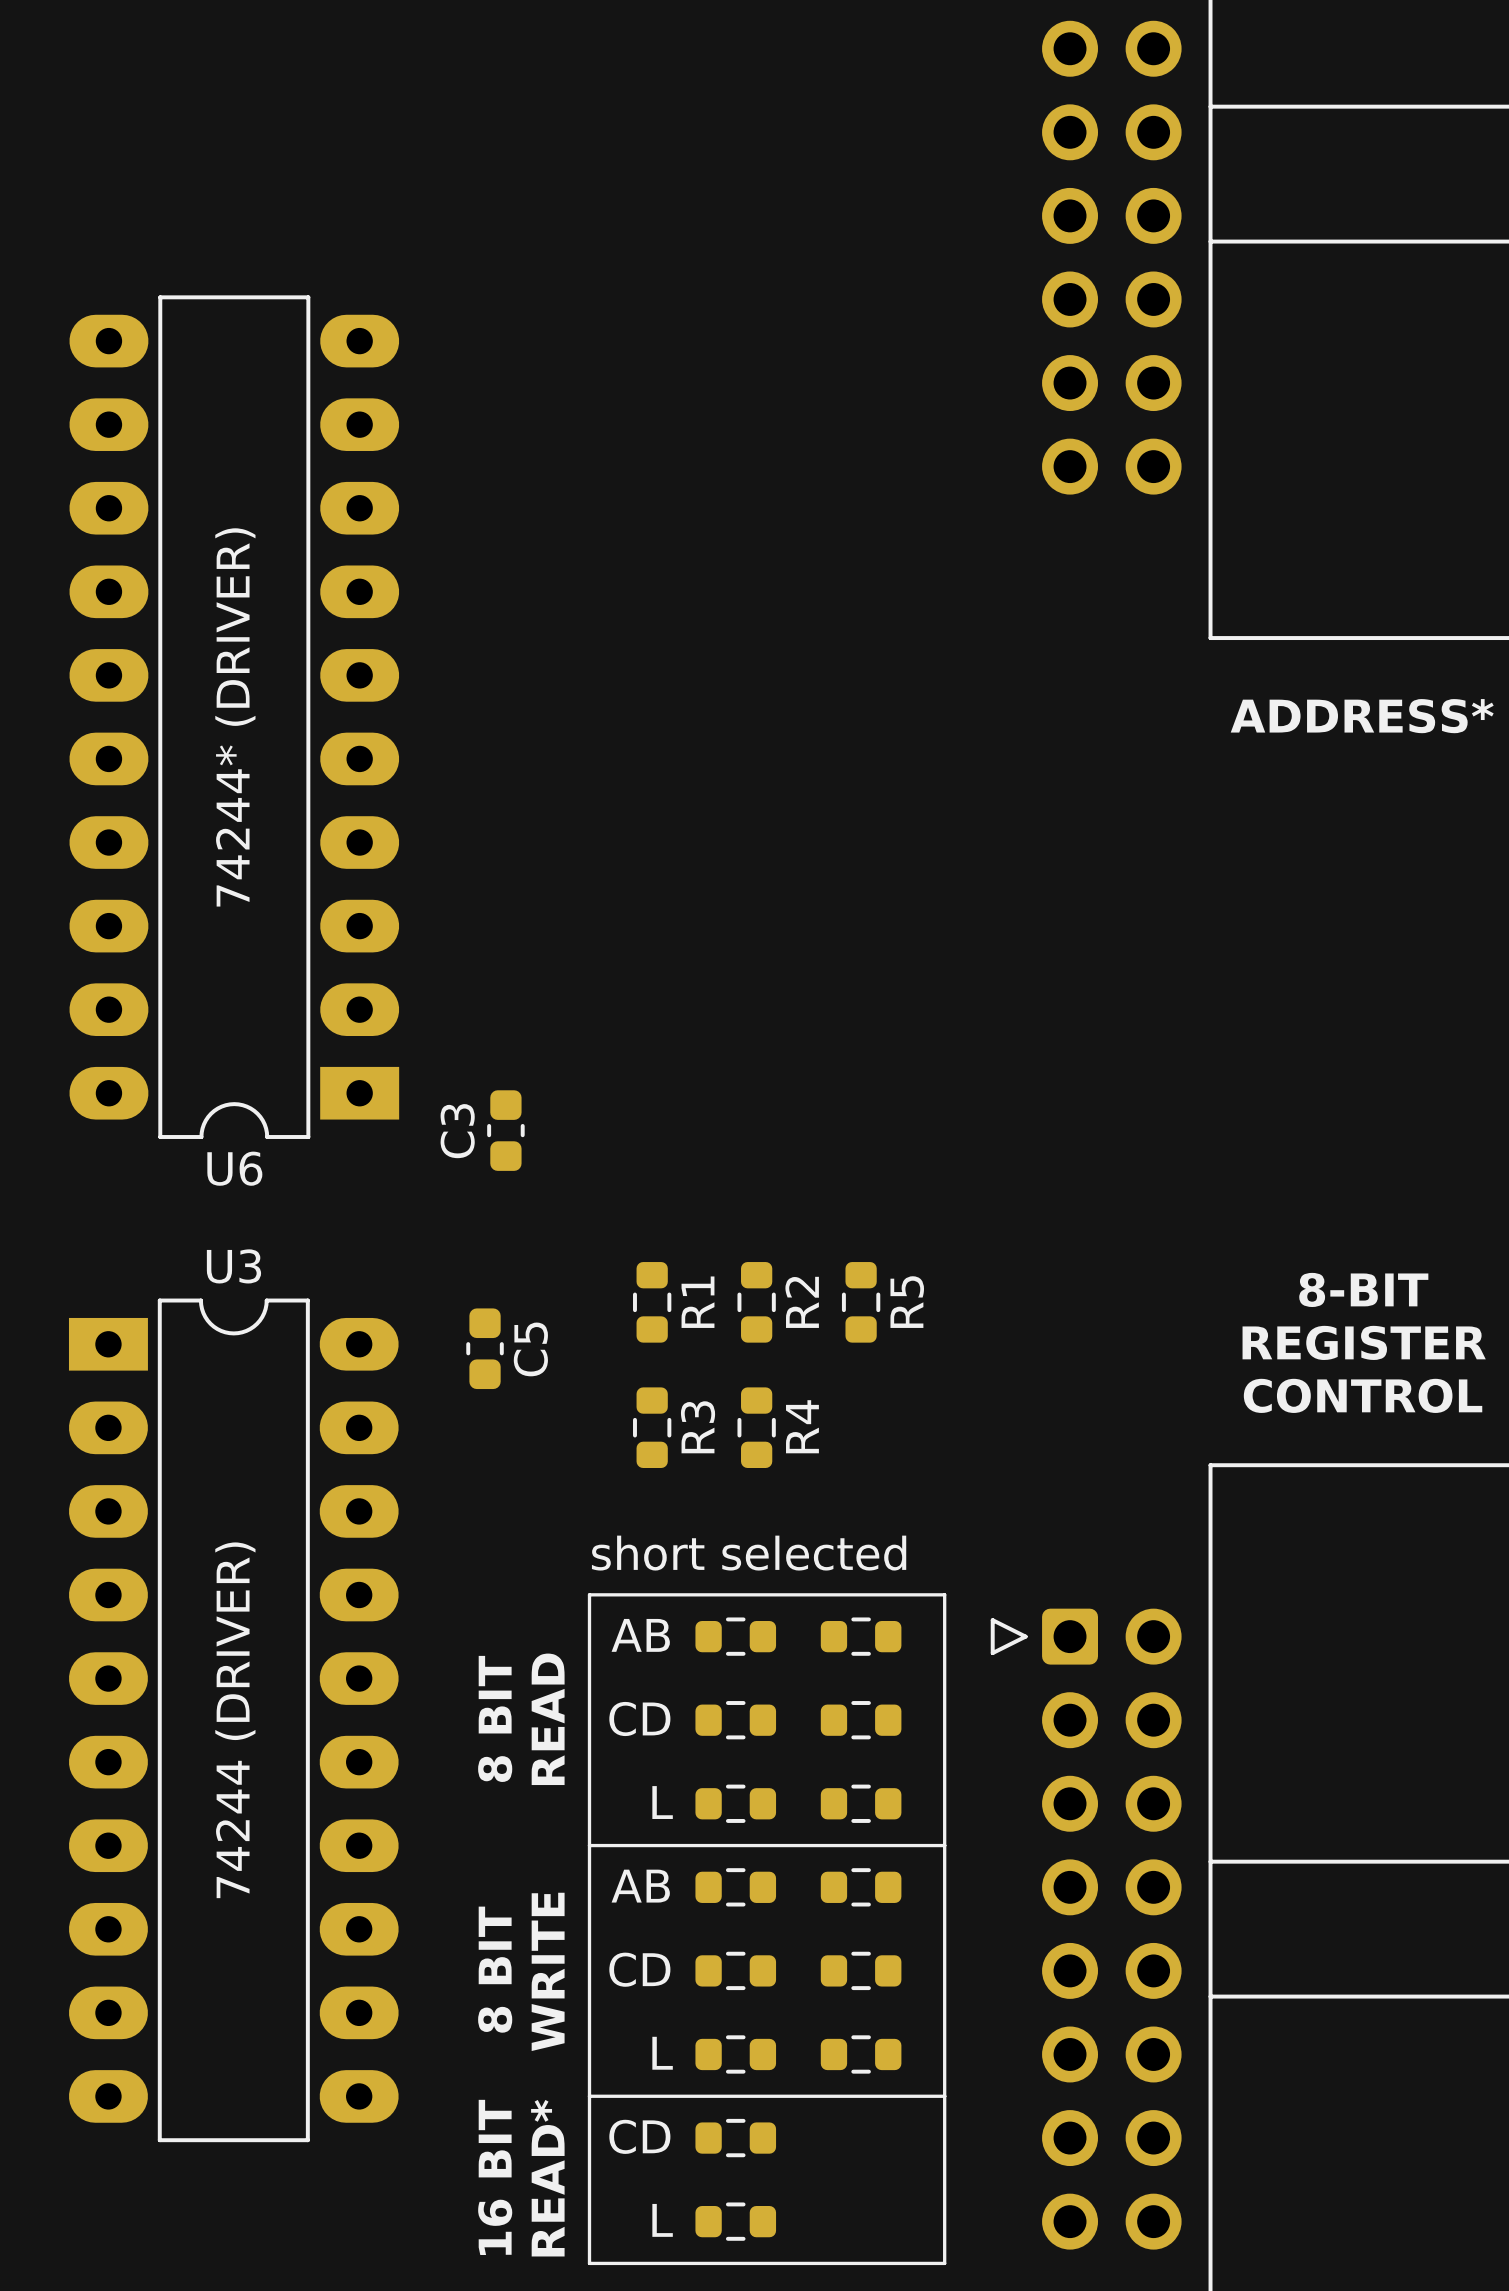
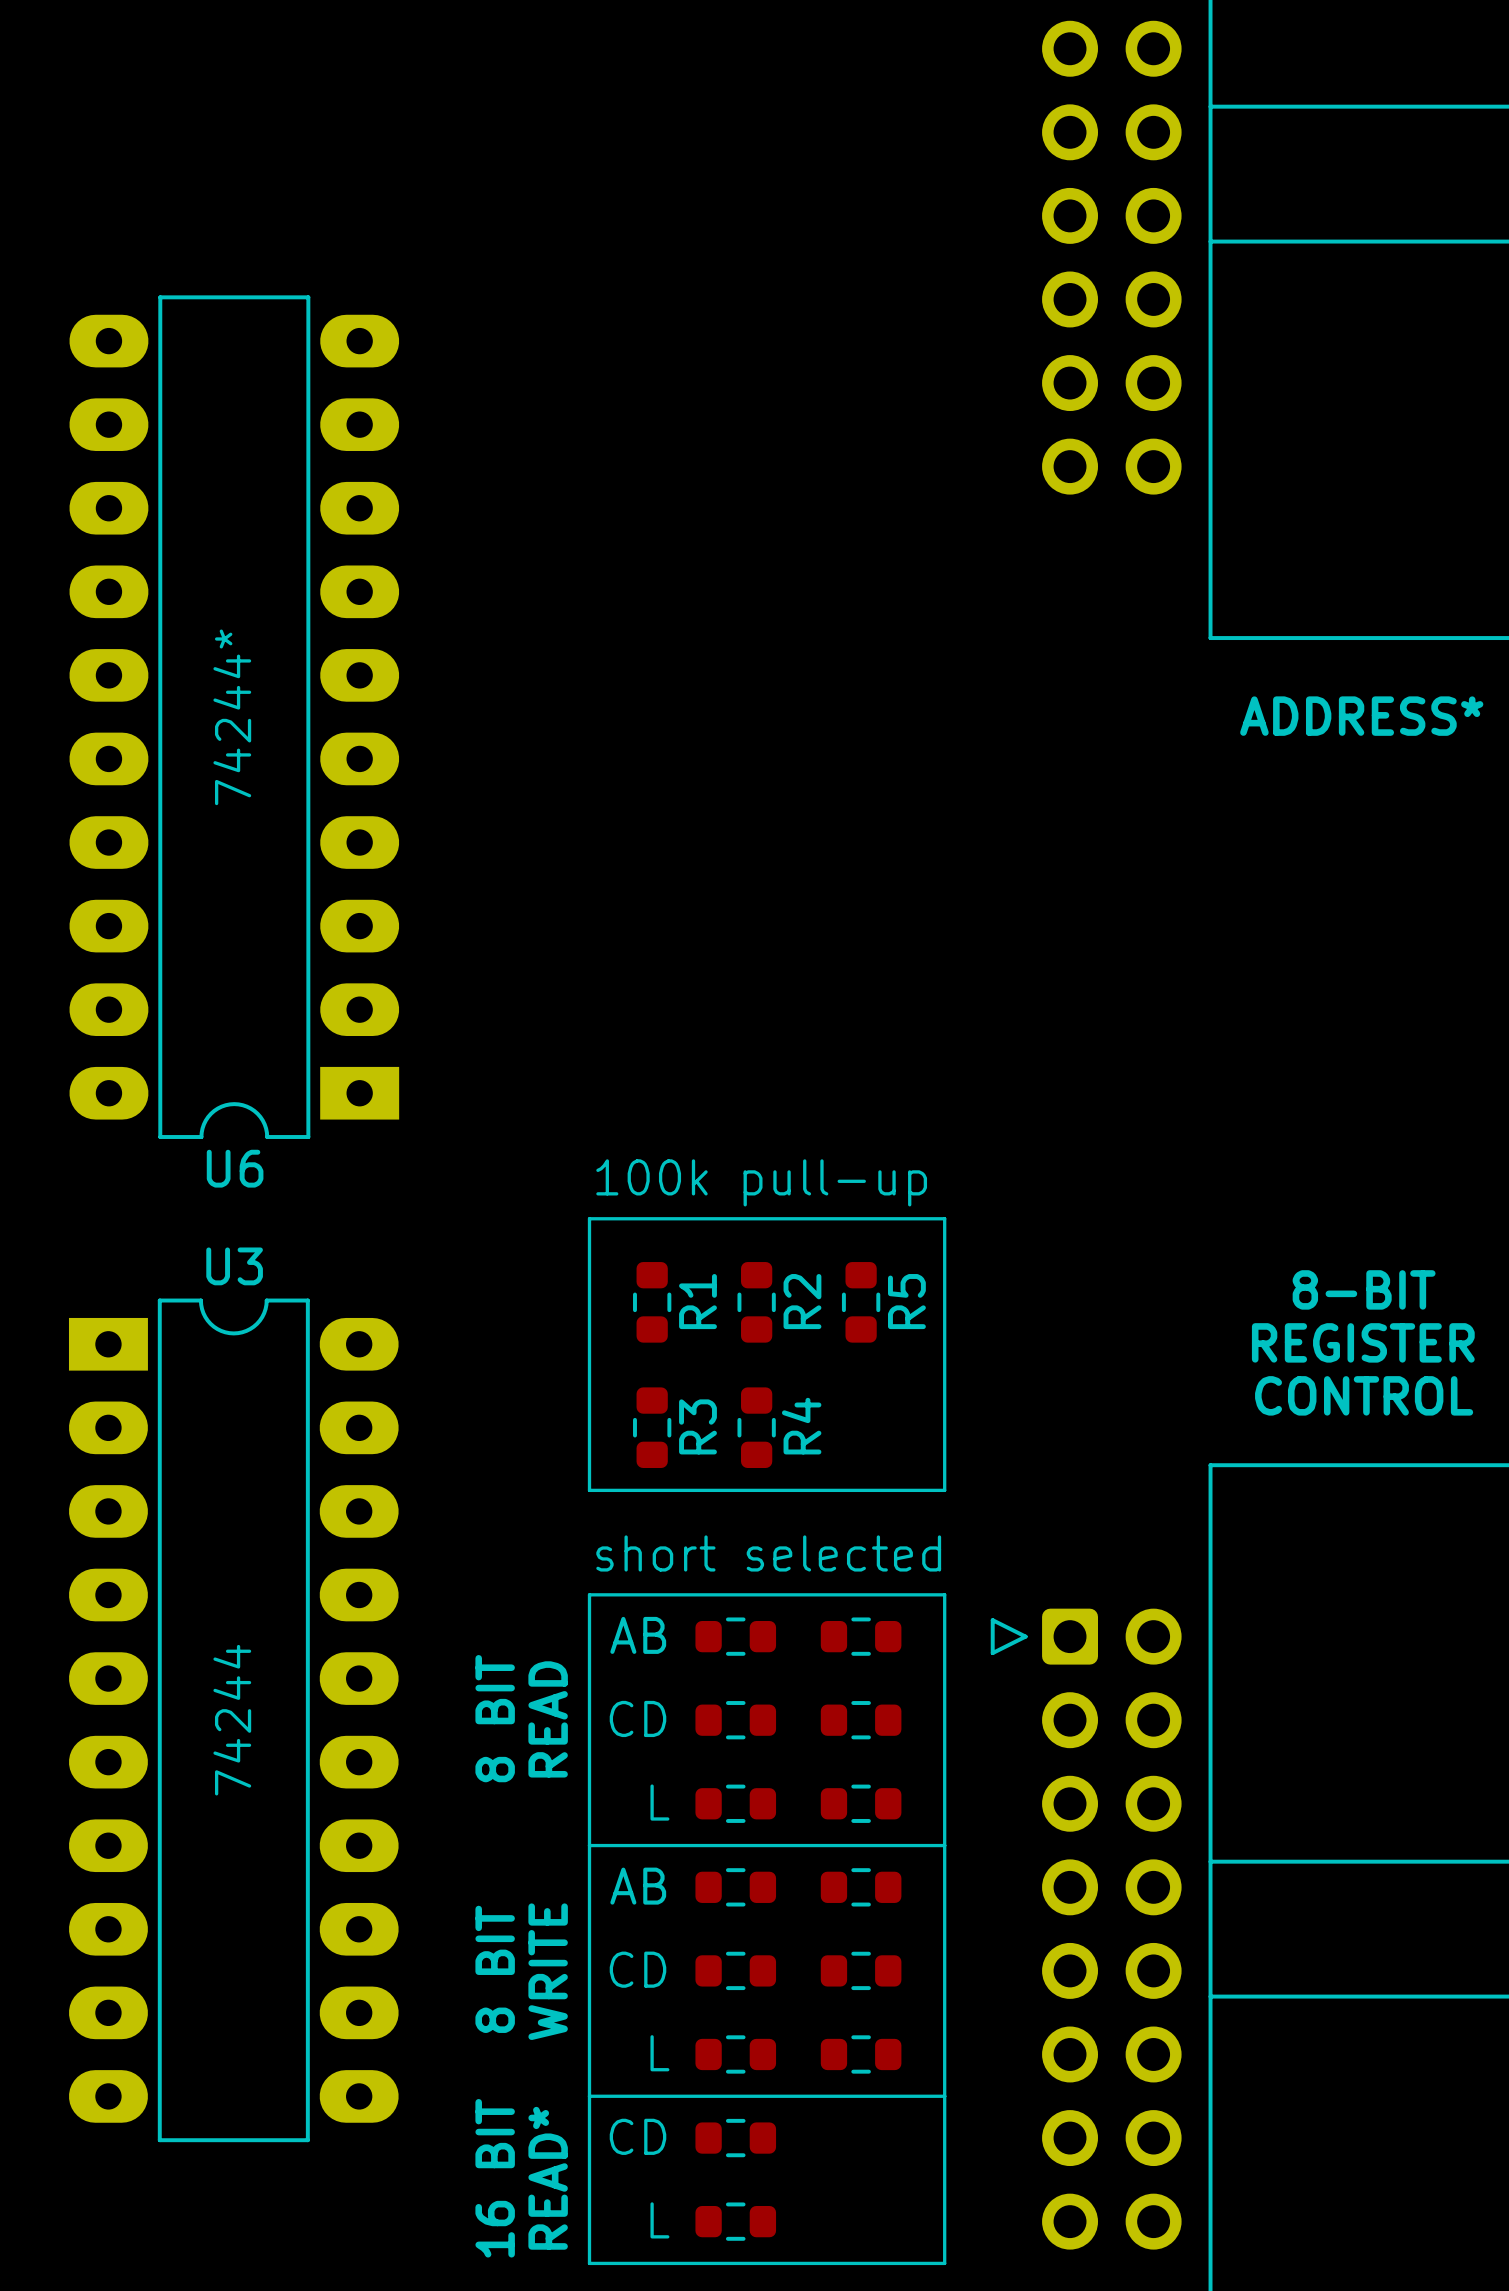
text: 74244* (DRIVER) (235, 717) -> 74244* (232, 717)
C3: (505, 1130) -> none
text: none -> 100k pull-up (761, 1182)
line: none -> (589, 1218) (944, 1218) (944, 1490) (589, 1490) (589, 1218)
C5: (485, 1348) -> none
text: 74244 (DRIVER) (235, 1720) -> 74244 (232, 1720)

